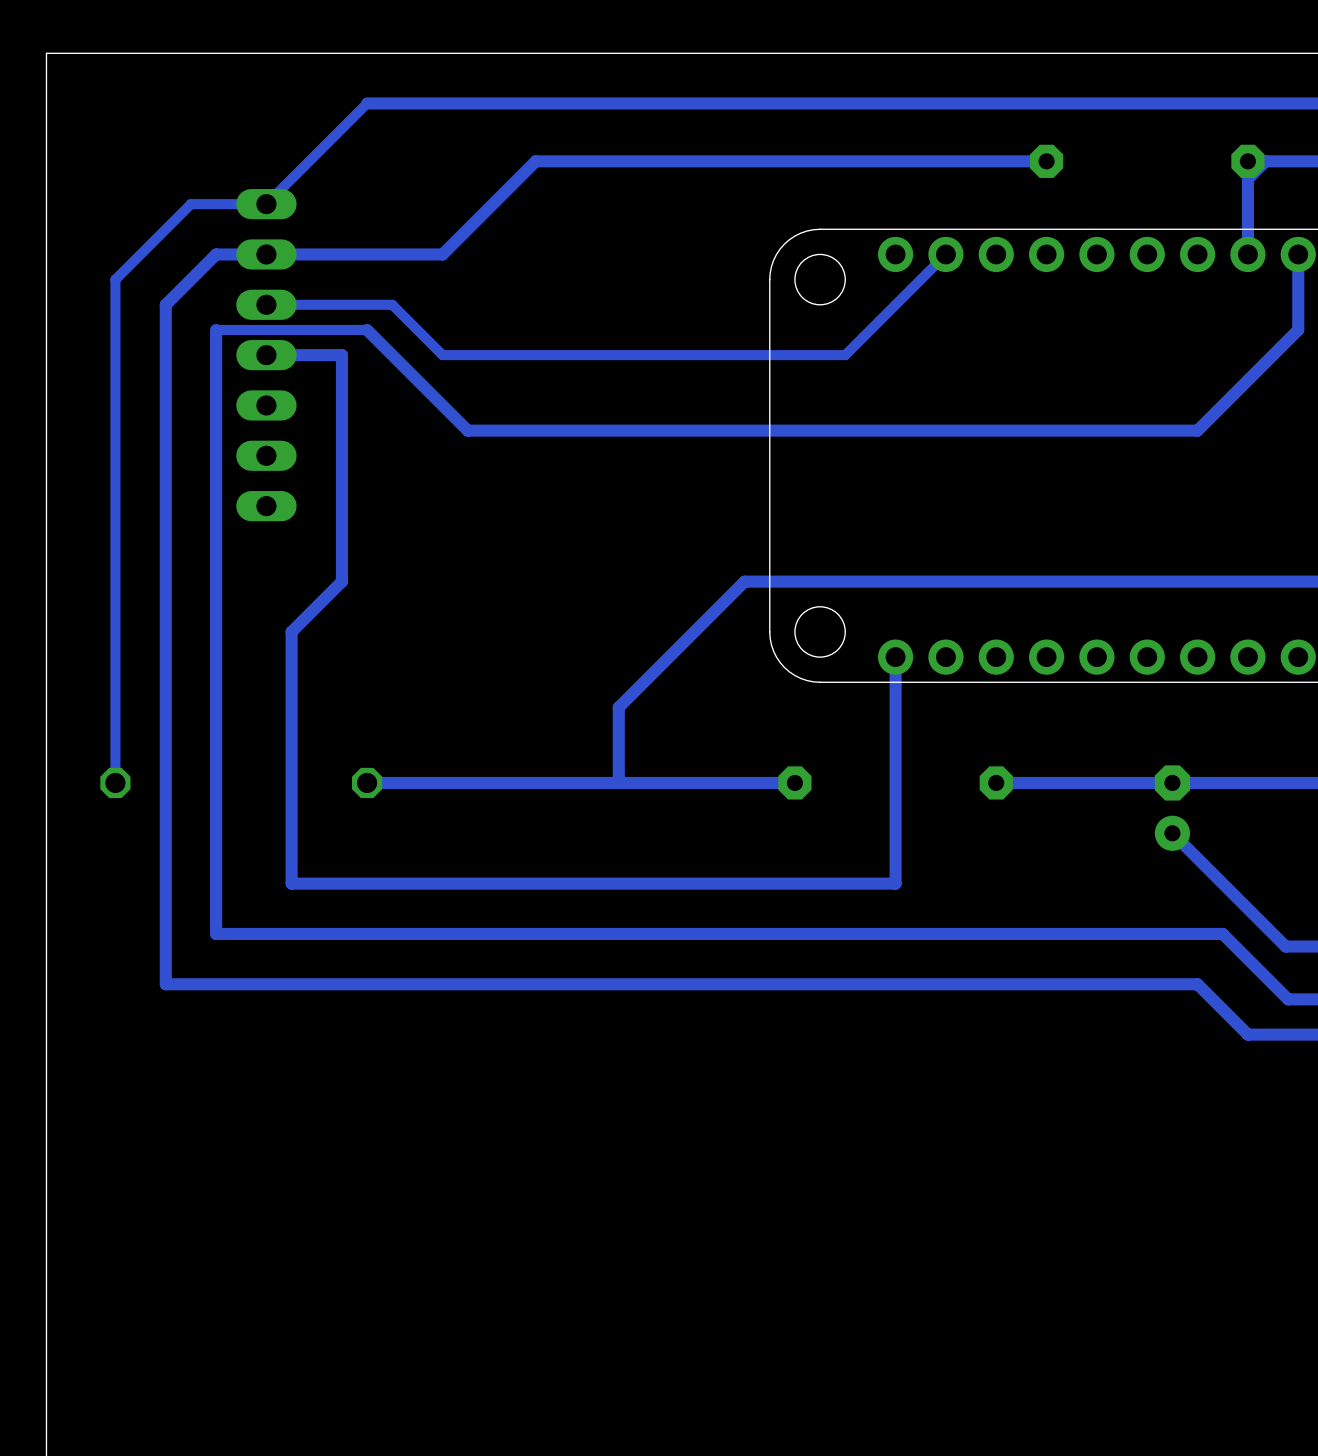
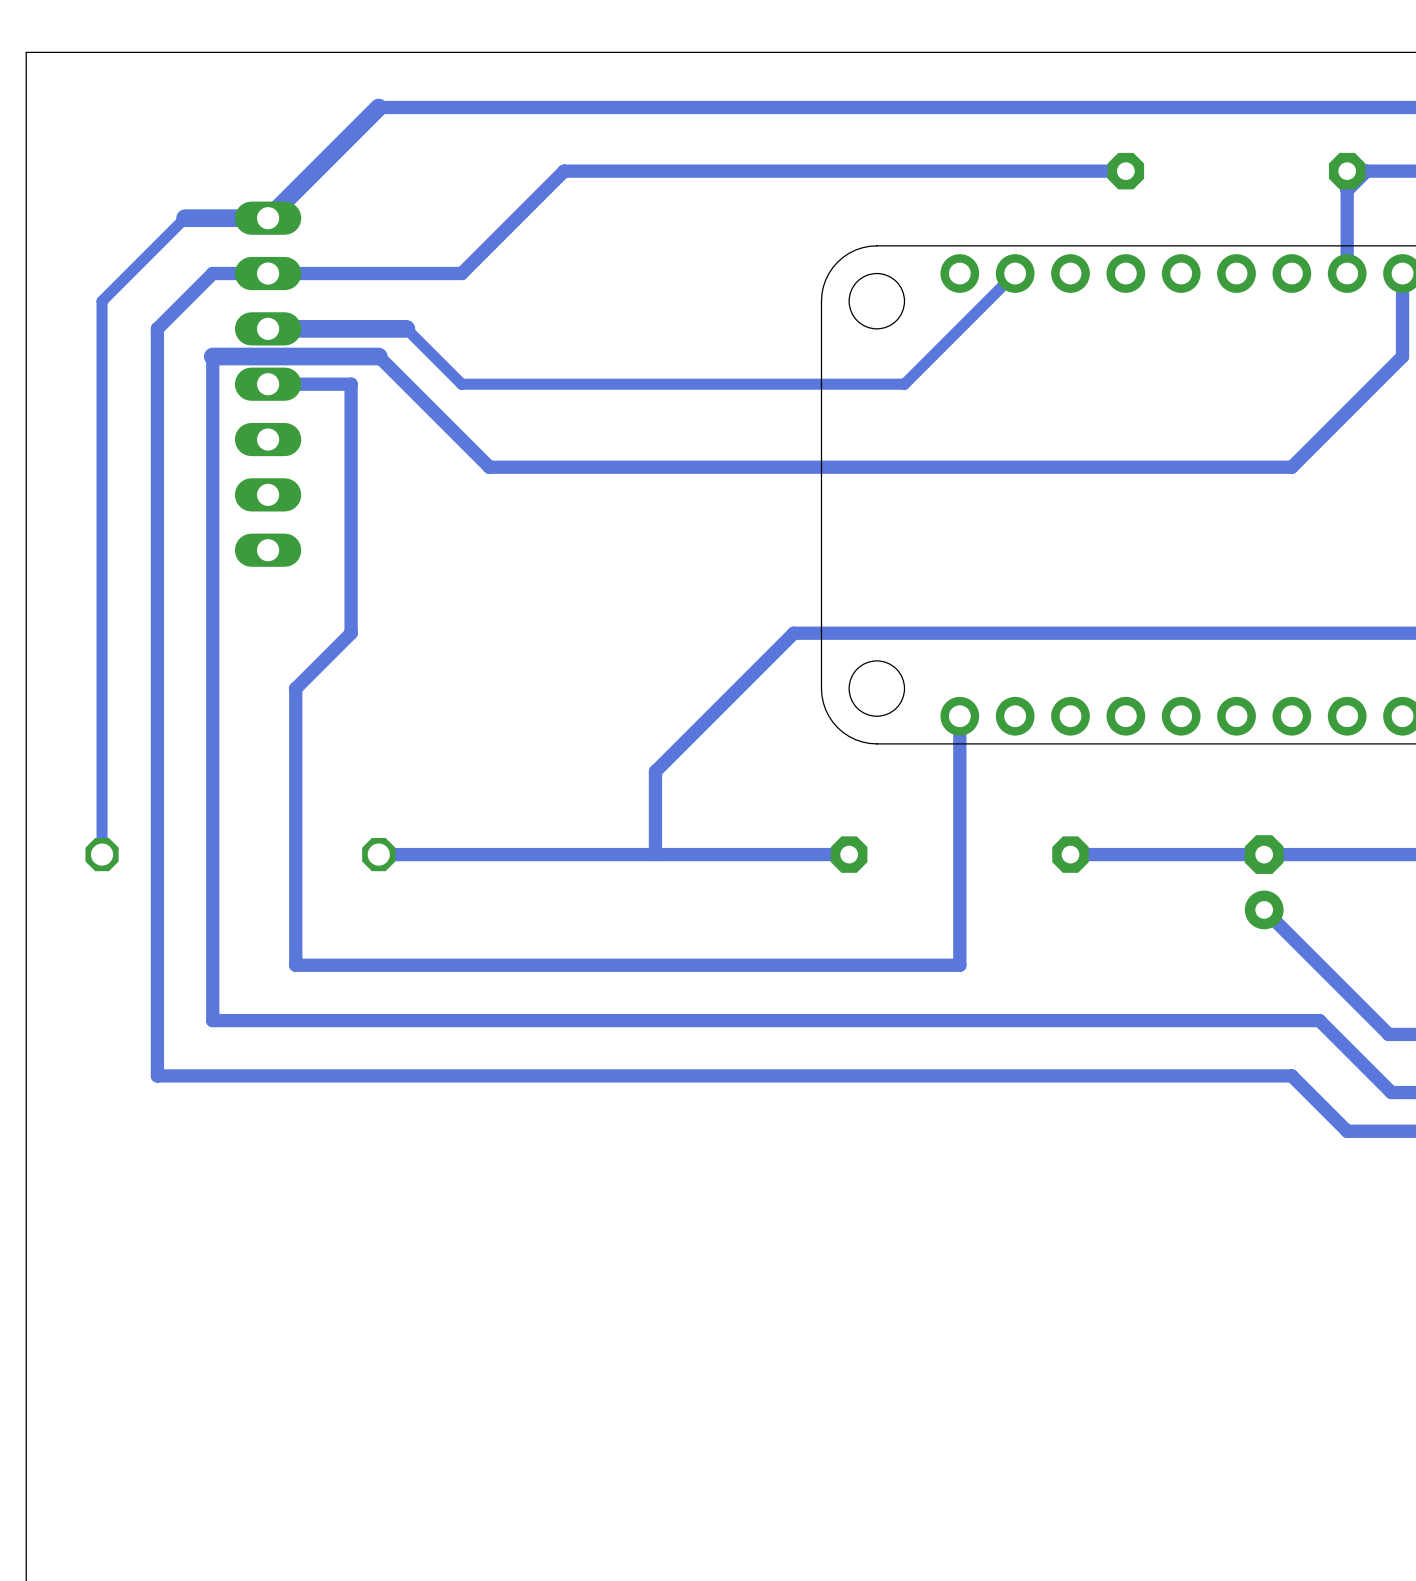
bottom track width: thin (367, 103) (266, 204) (190, 204) -> thick (378, 107) (268, 218) (185, 218)
bottom track width: thin (392, 304) (266, 304) -> thick (406, 328) (268, 328)
bottom track width: thin (367, 329) (216, 329) -> thick (378, 356) (212, 356)

